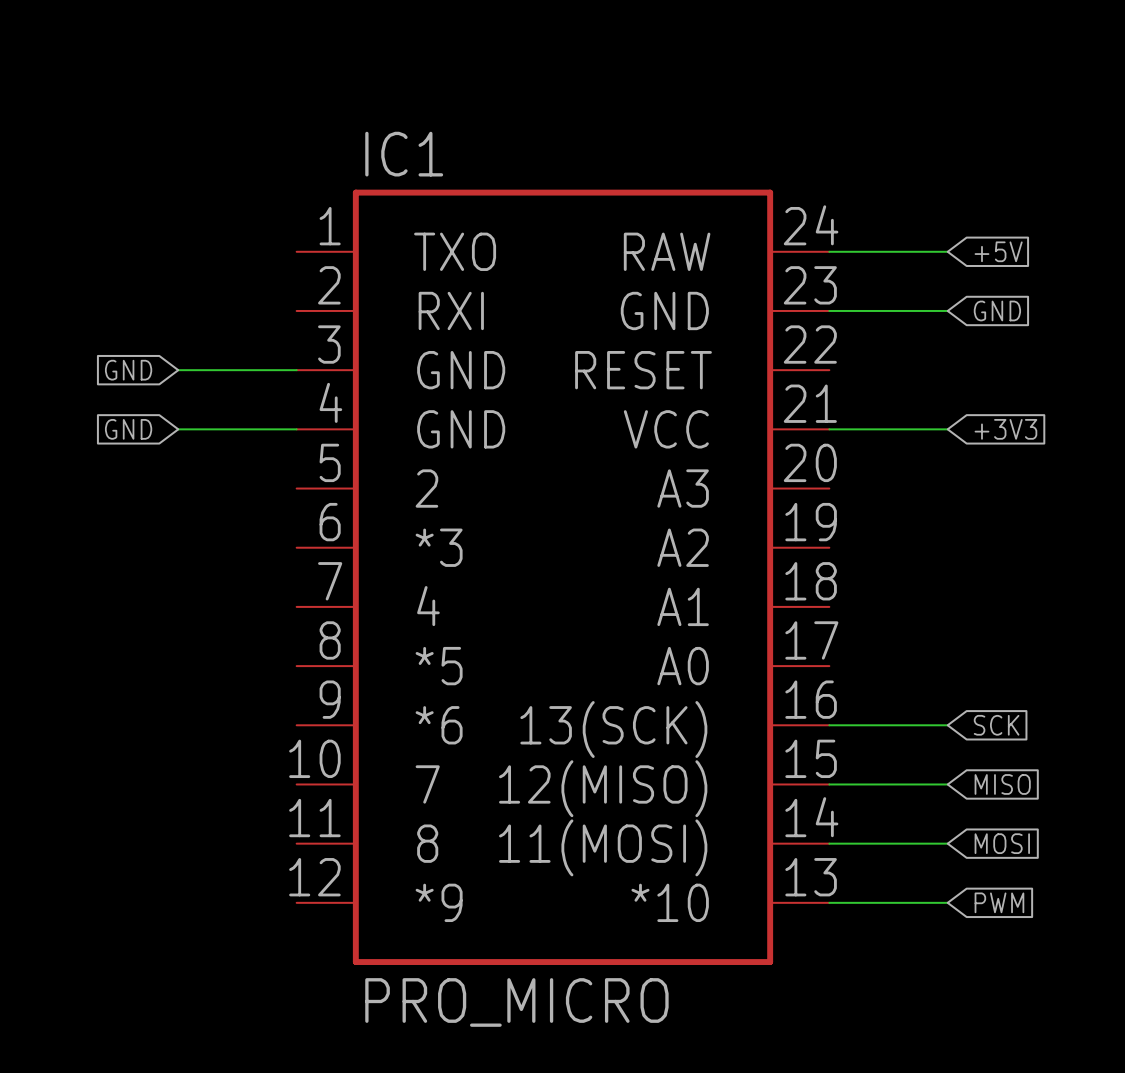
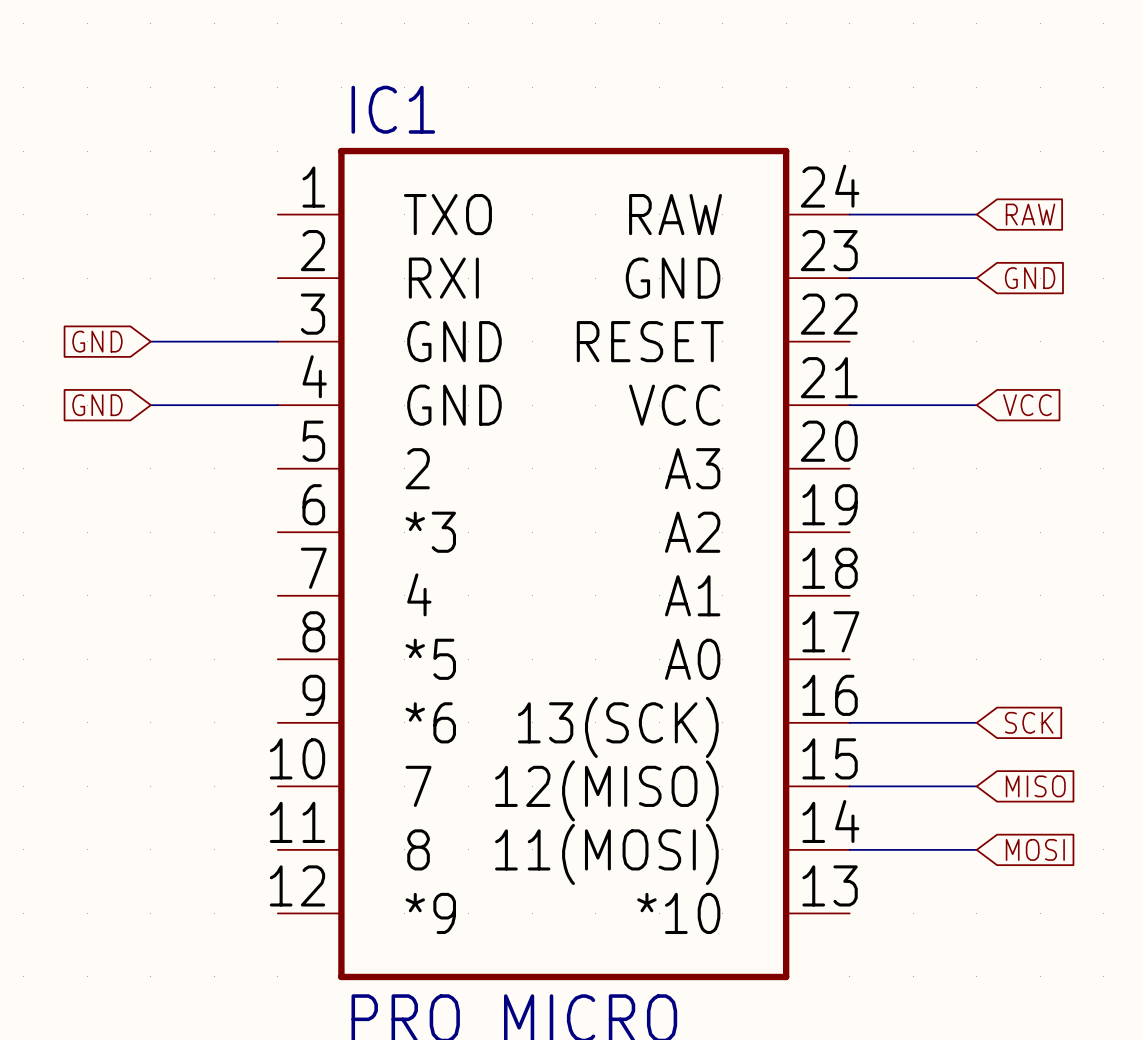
global label: +5V (998, 251) -> RAW (1030, 214)
global label: +3V3 (1005, 429) -> VCC (1027, 405)
wire: (829, 902) (947, 902) -> none
global label: PWM (999, 902) -> none

